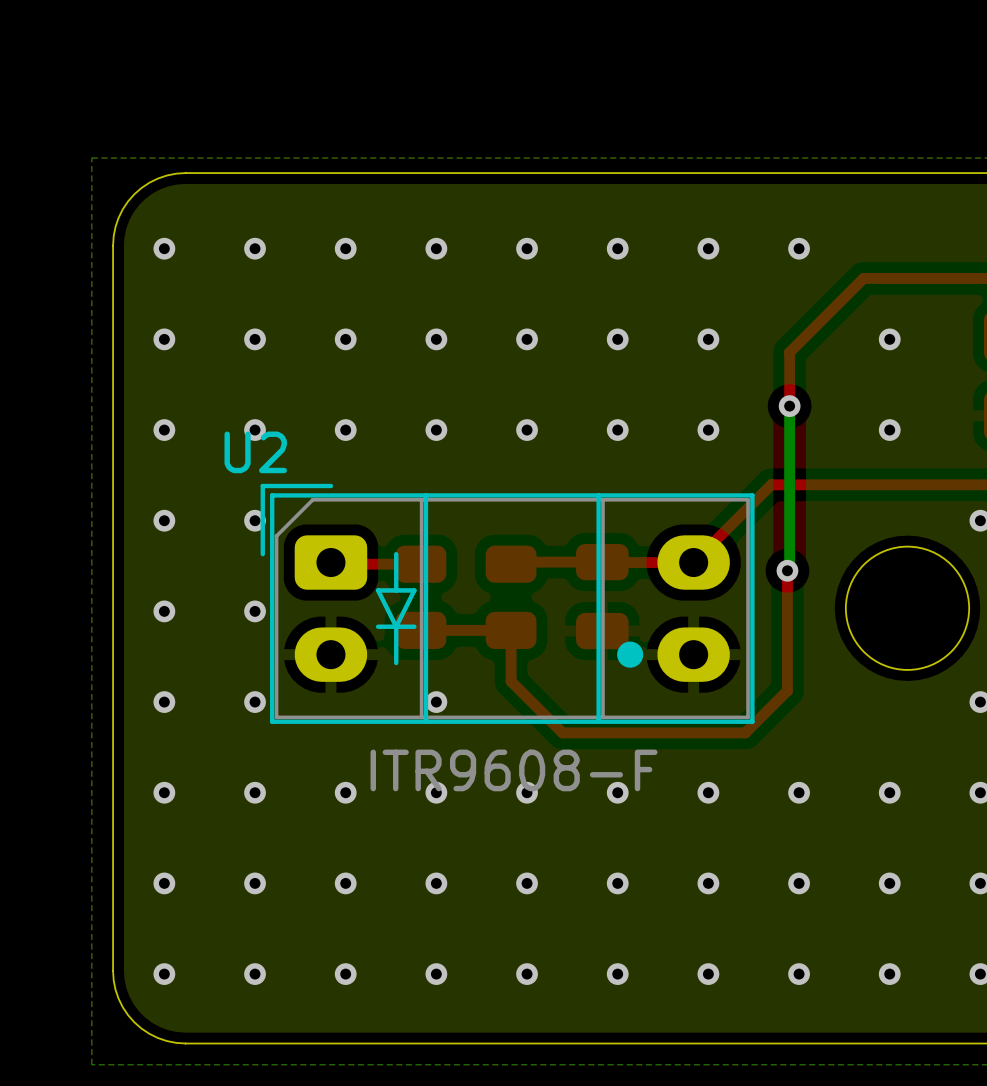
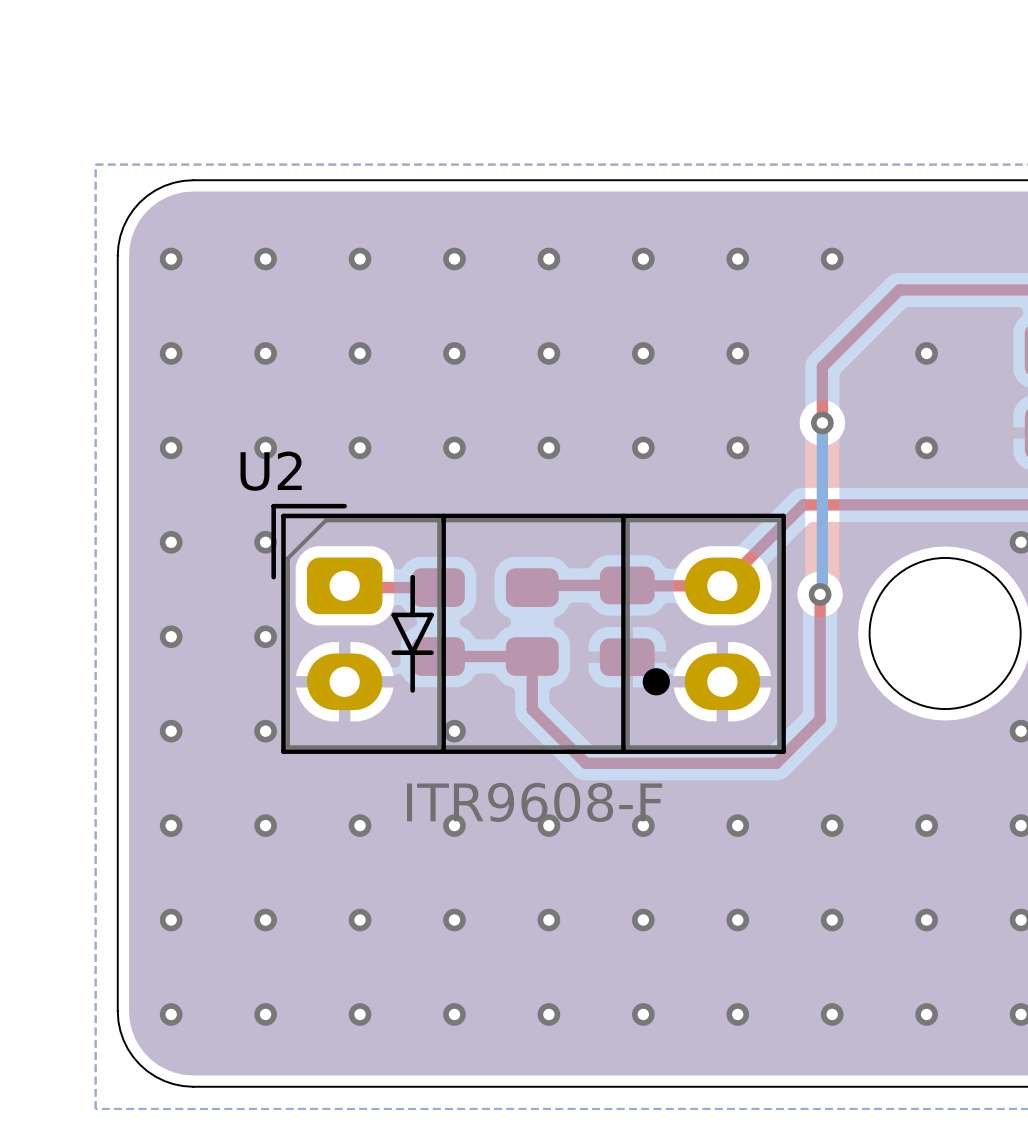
round board edge size: [844, 545, 971, 671] -> [868, 557, 1022, 710]

